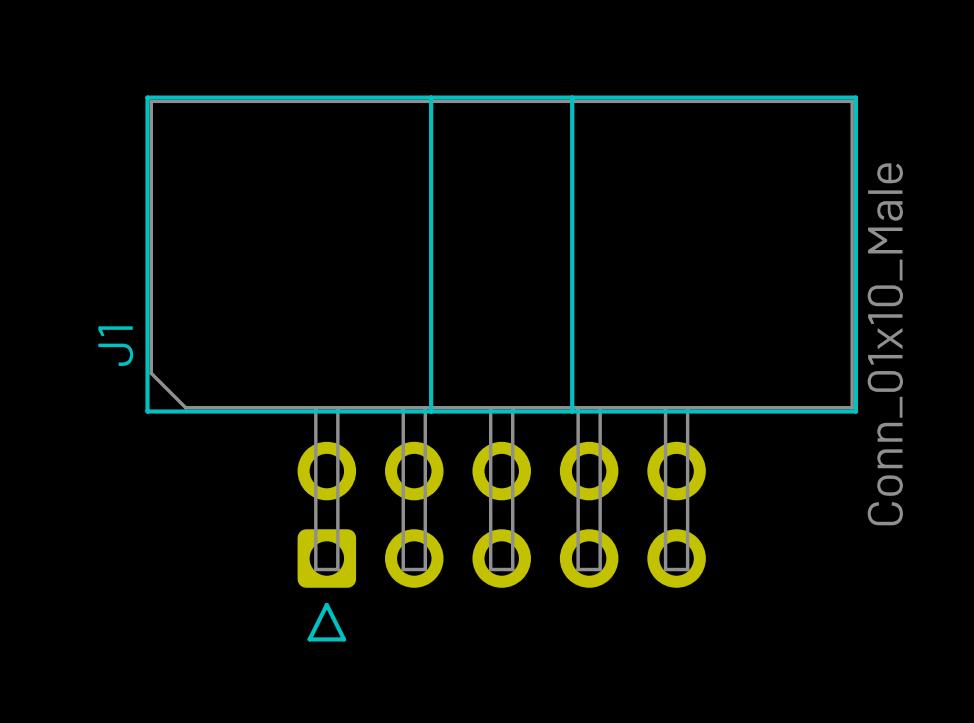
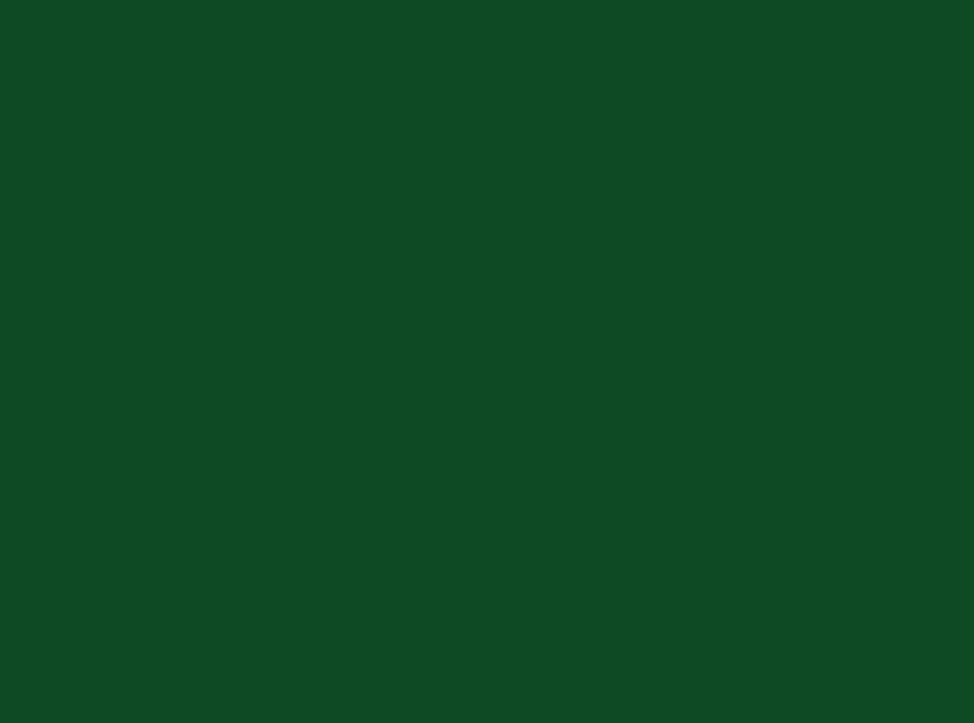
J1: Conn_01x10_Male (501, 368) -> none

